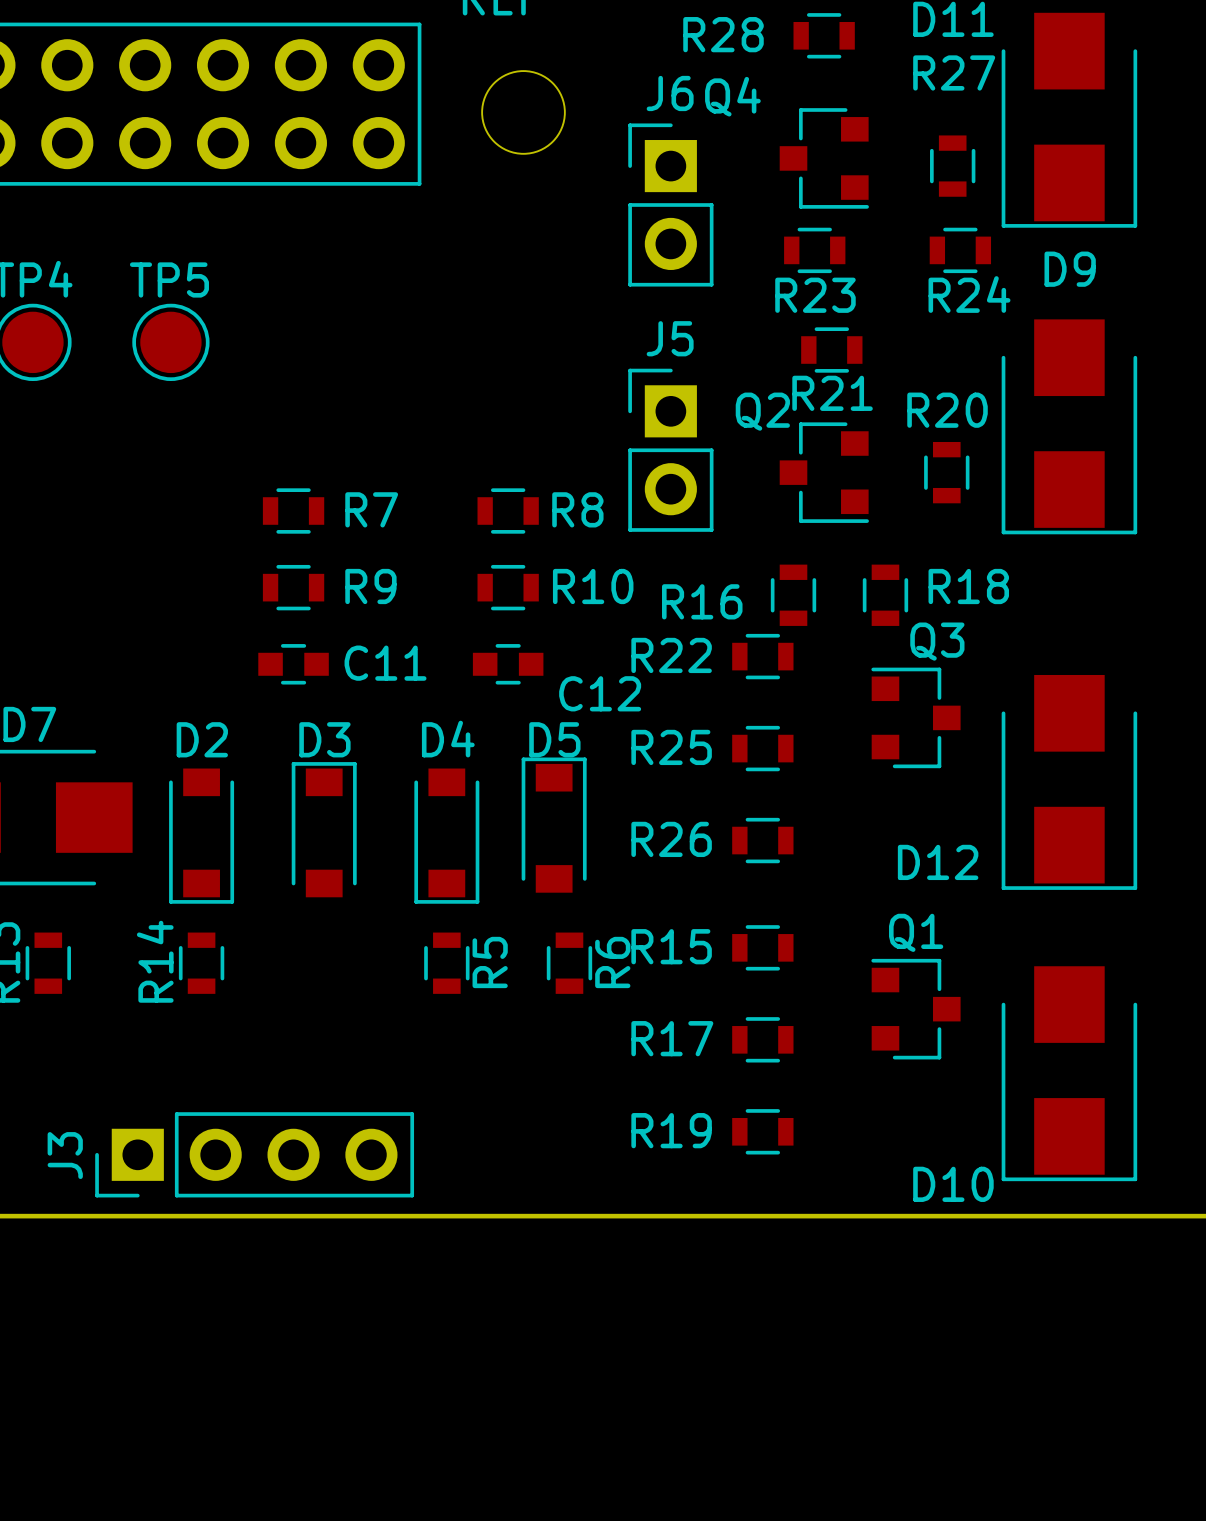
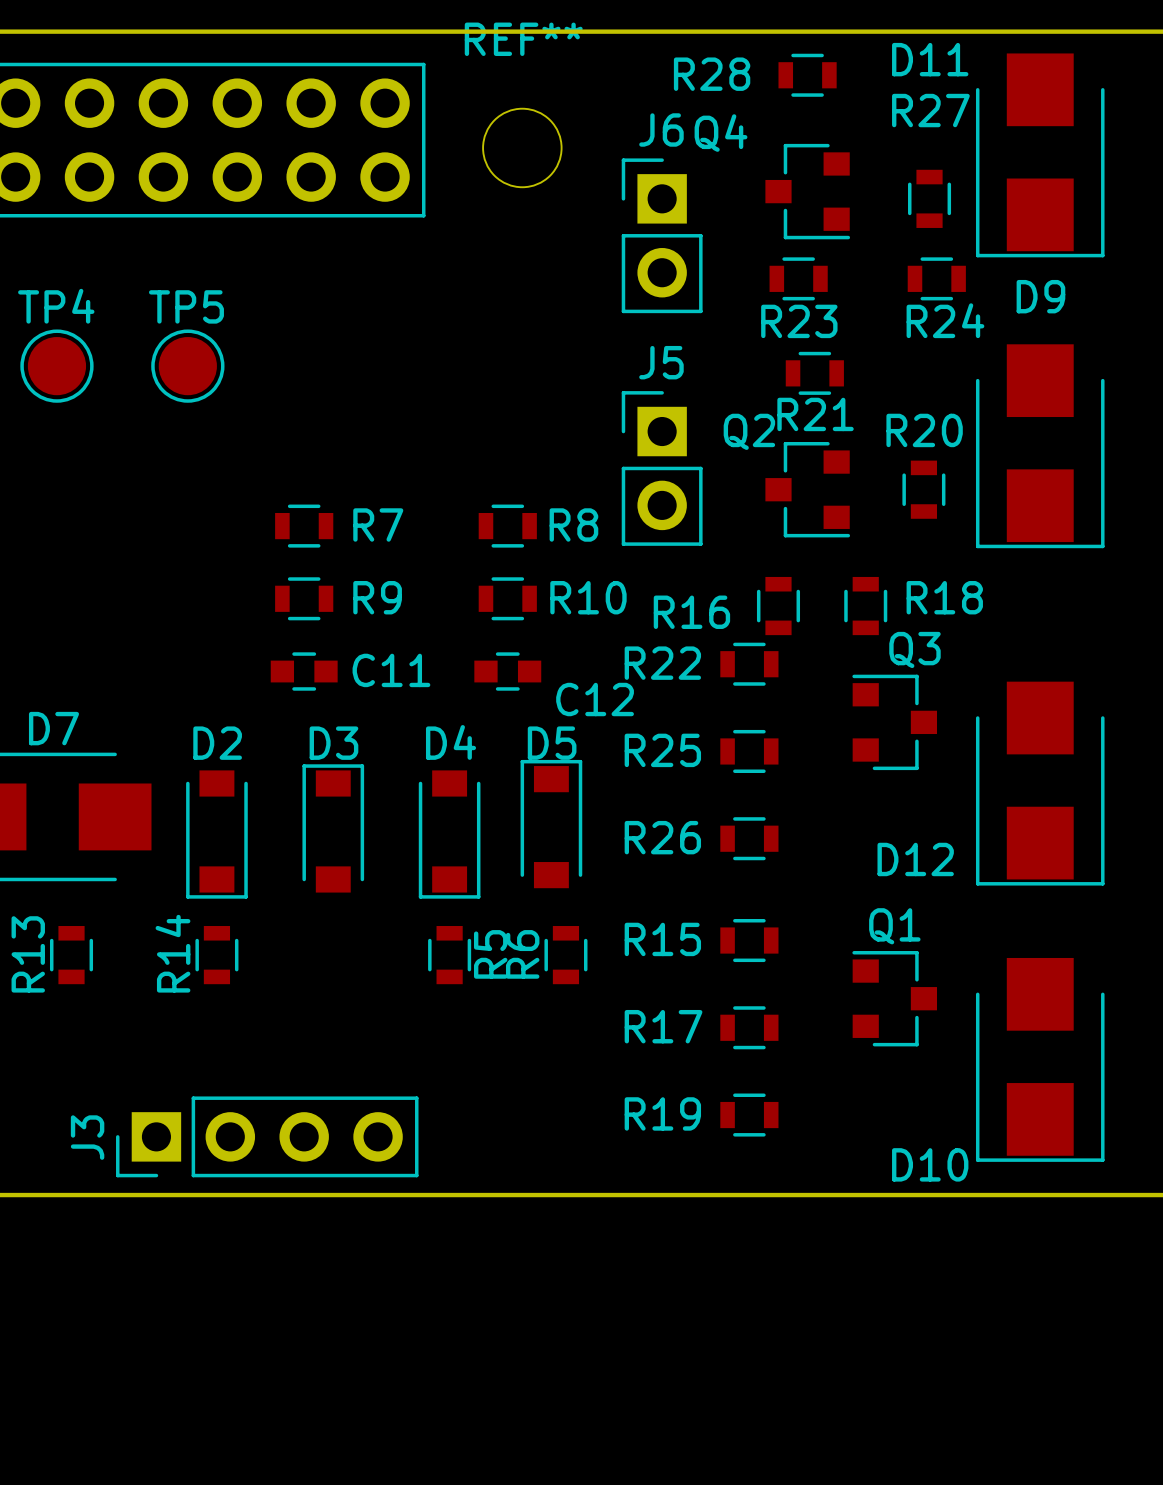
R6 name position: R6 (612, 962) -> R6 (522, 954)

